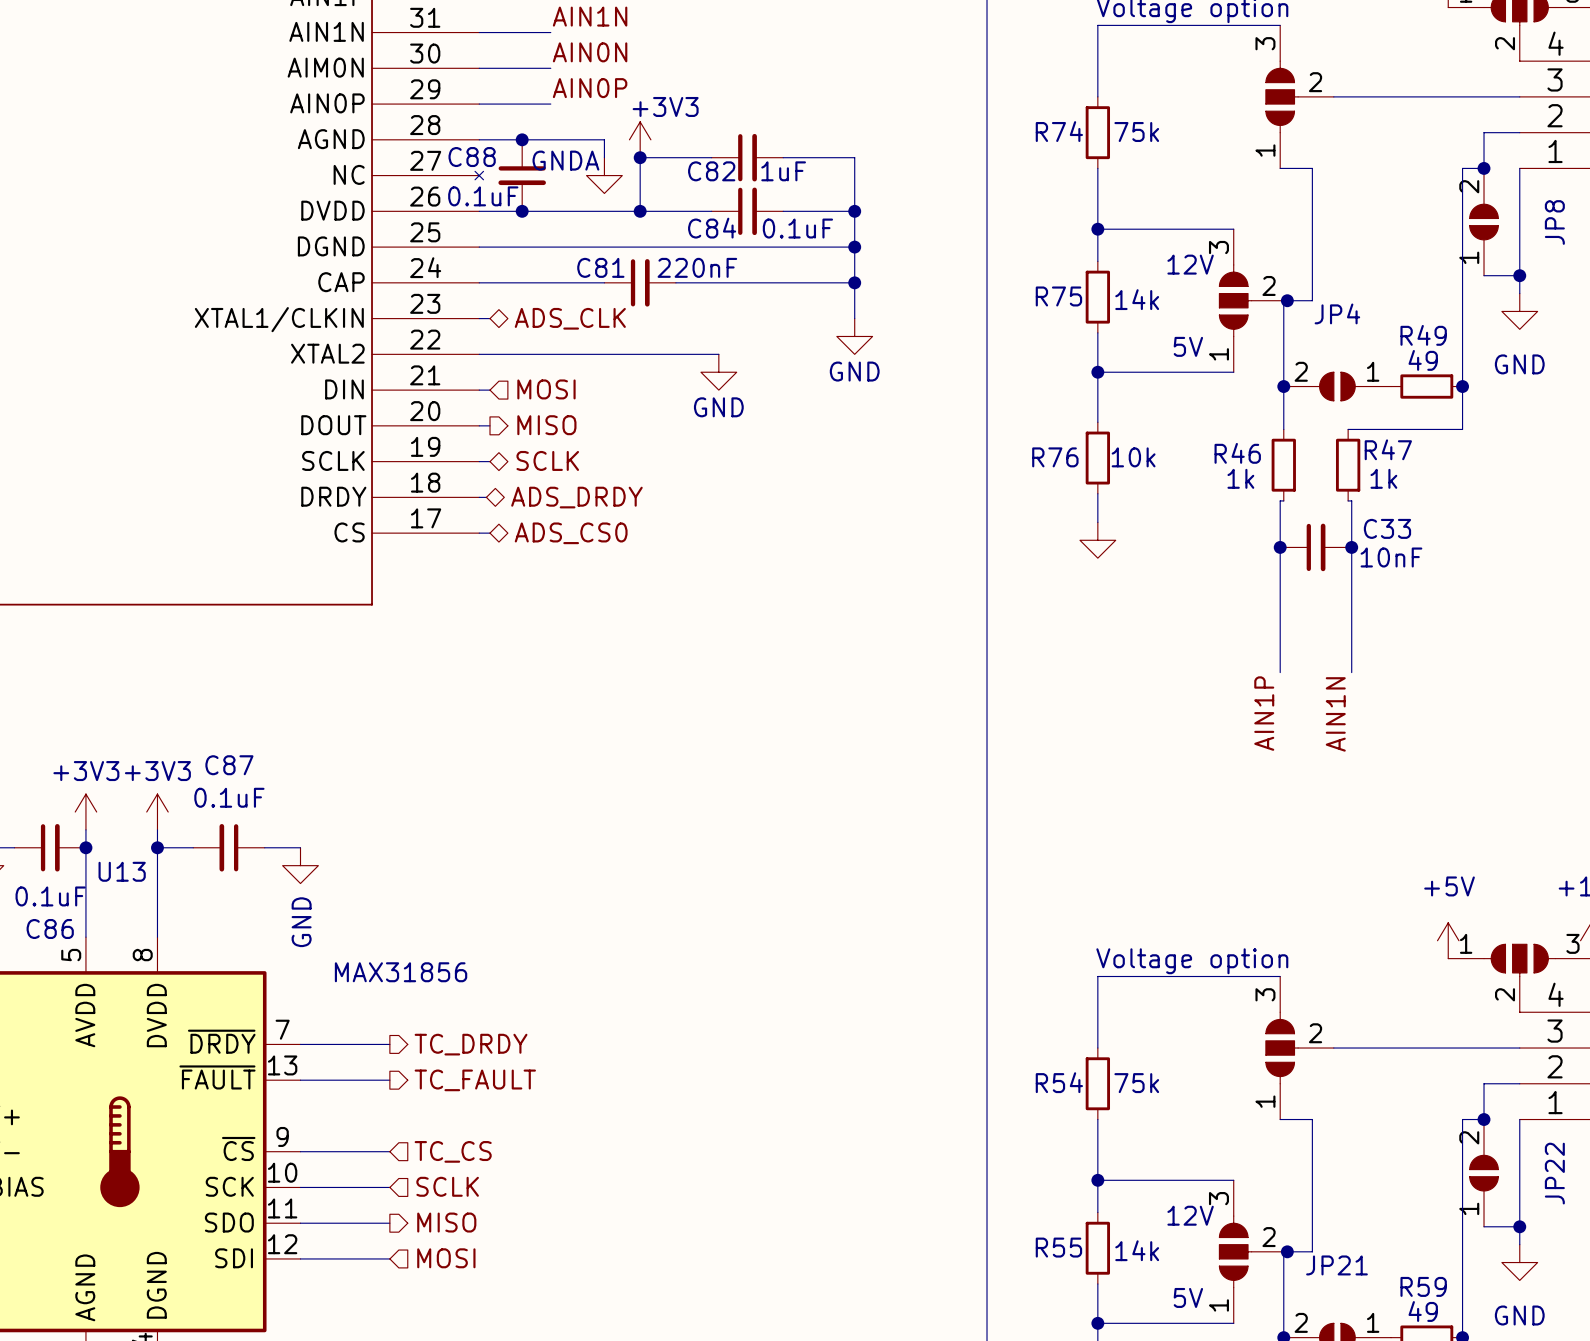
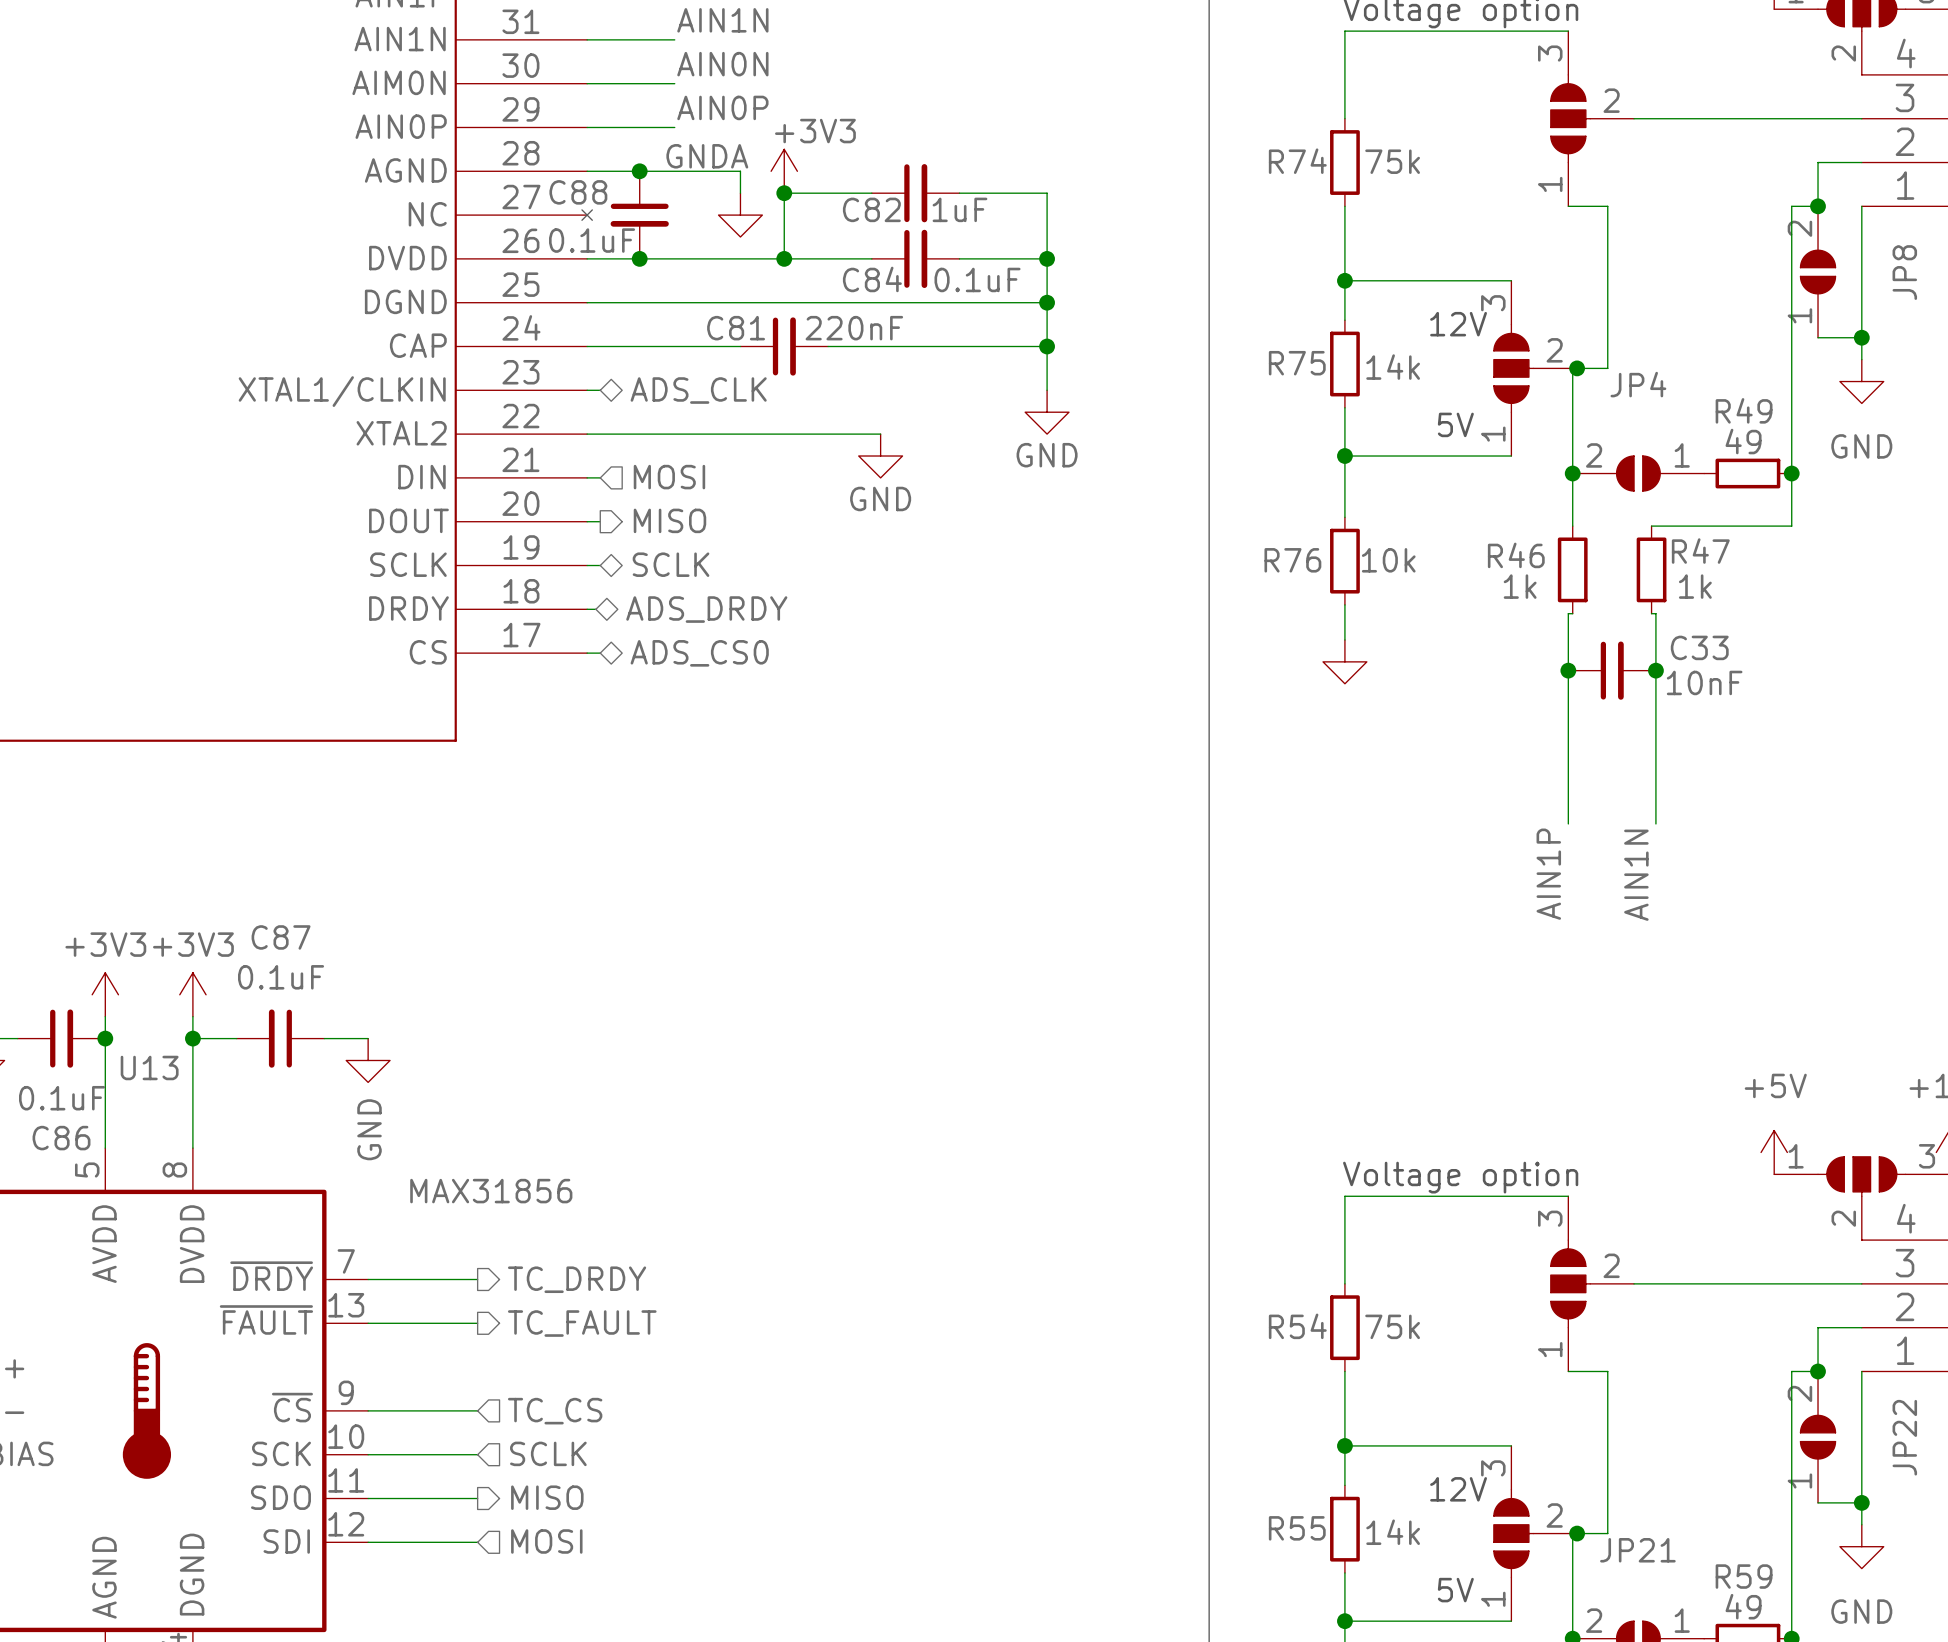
power symbol text position: GNDA (565, 160) -> GNDA (707, 156)

